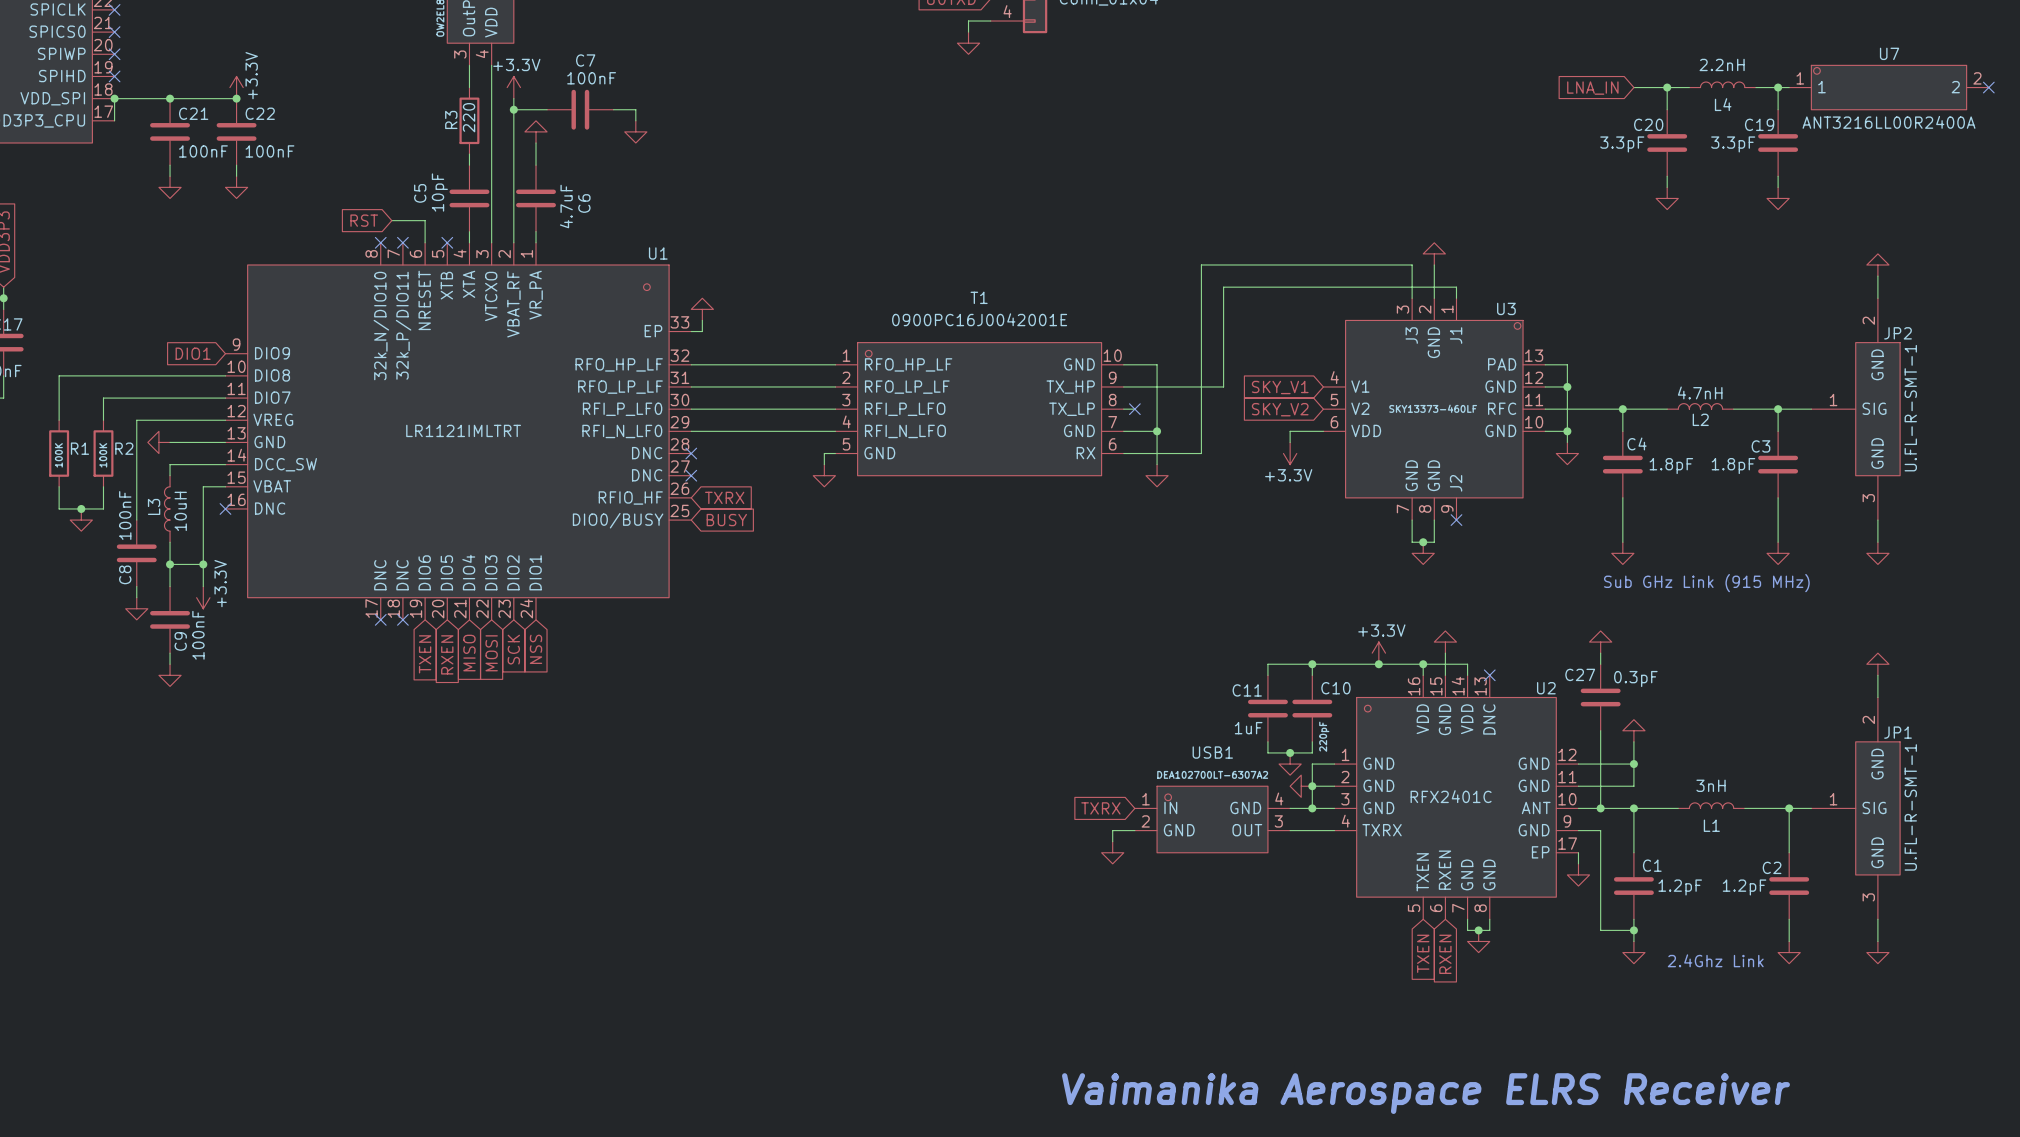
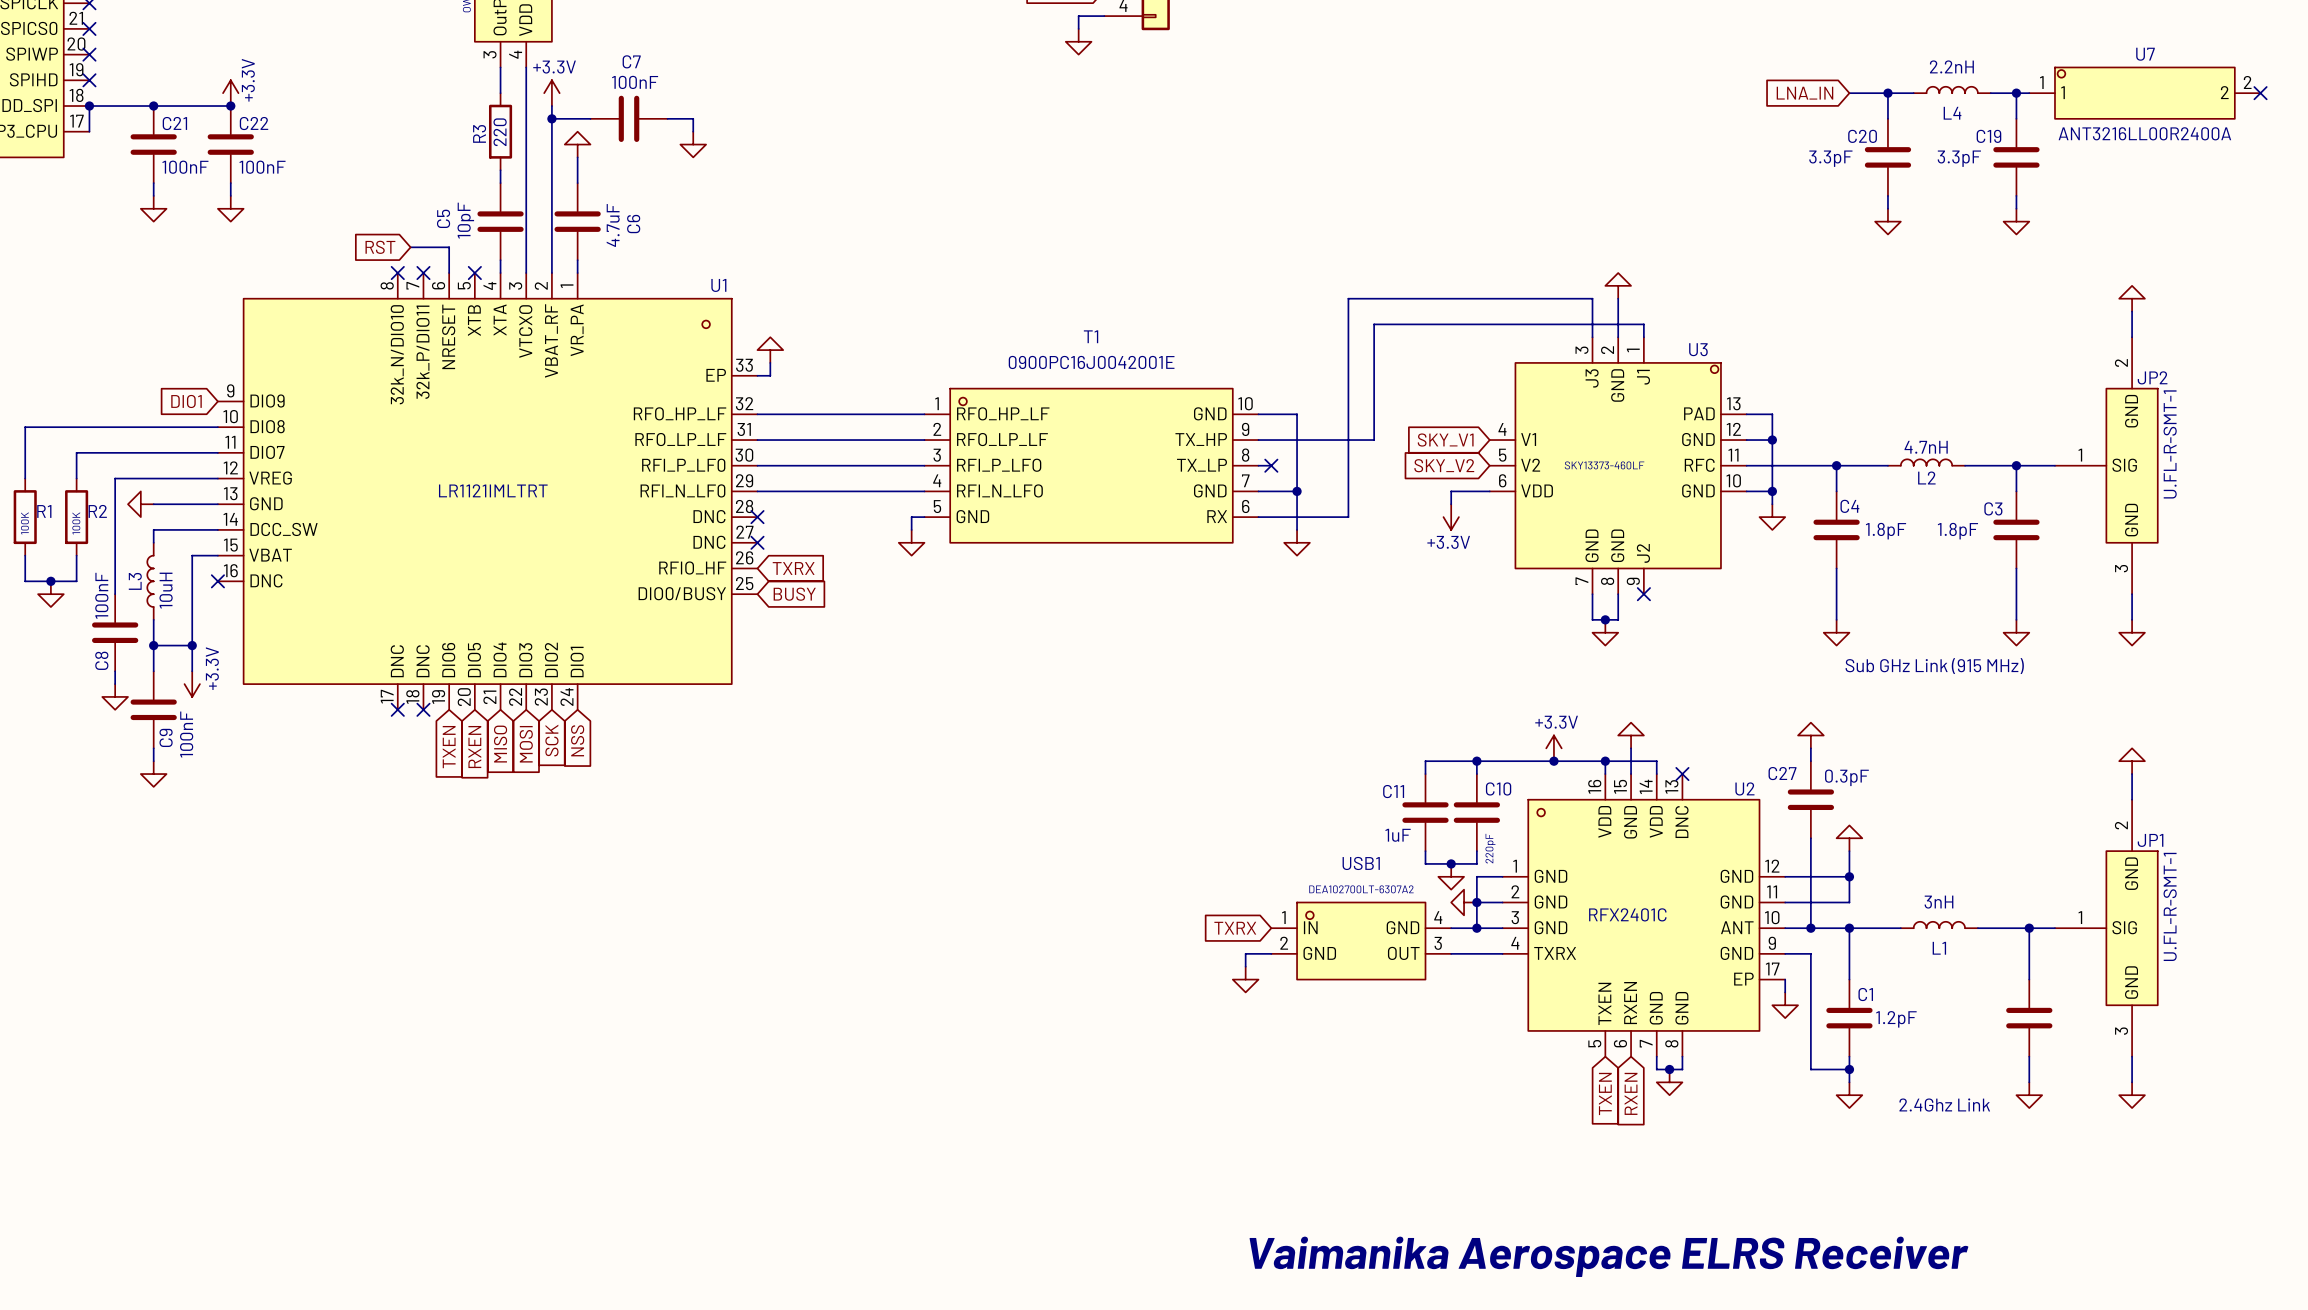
C2 name: C2 (1772, 867) -> none
C2 value: 1.2pF (1744, 887) -> none

